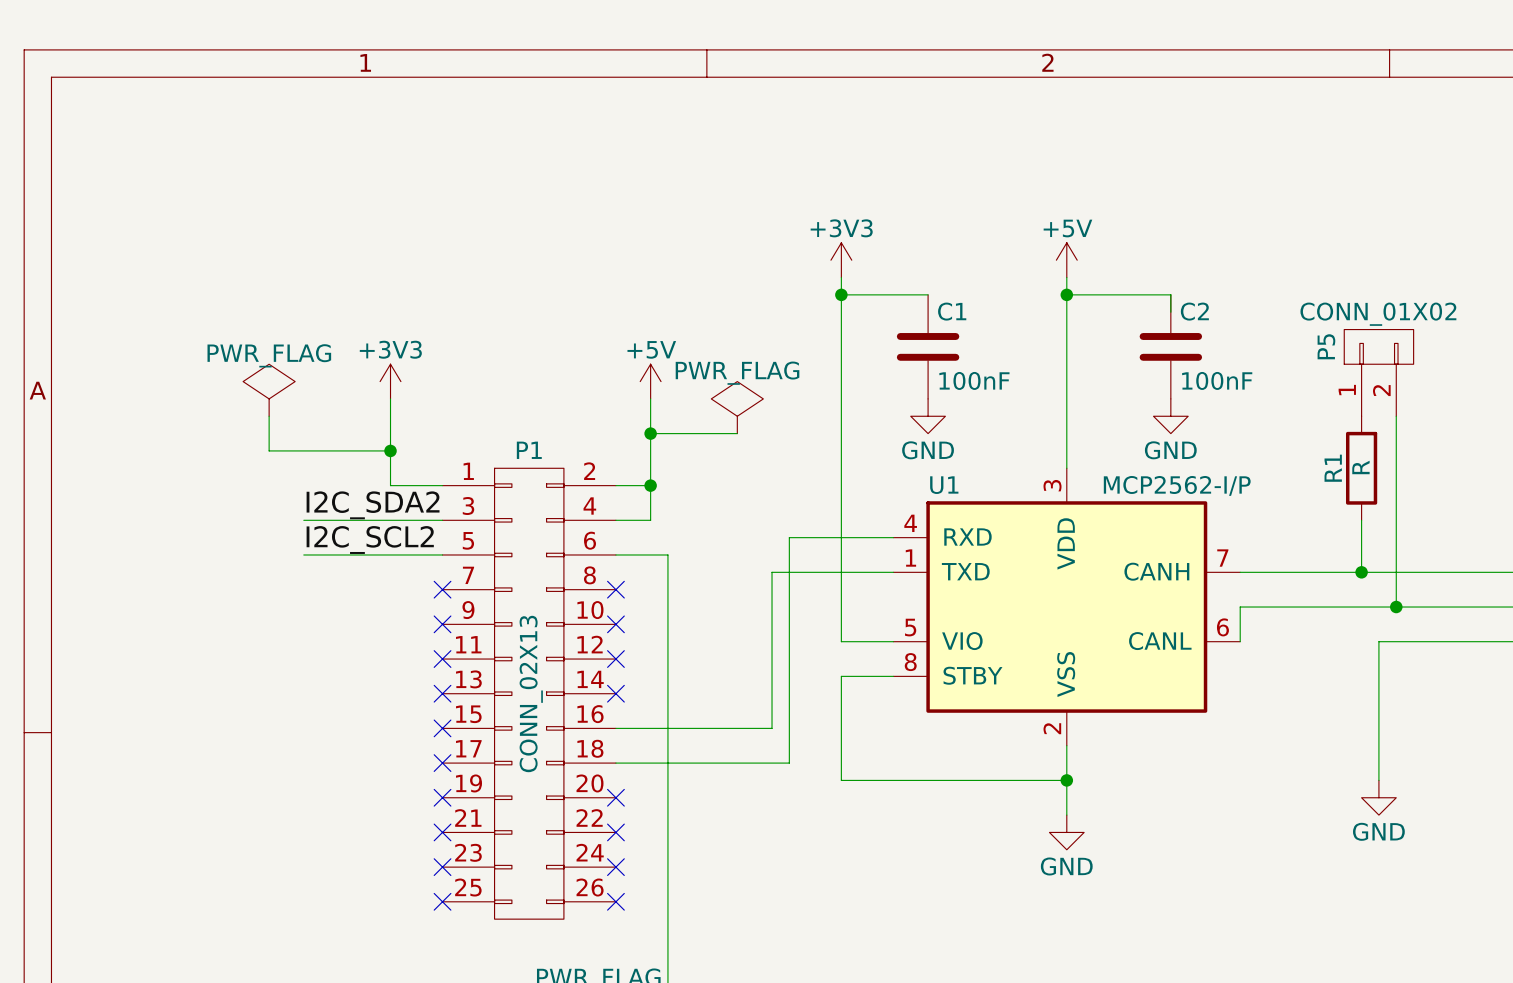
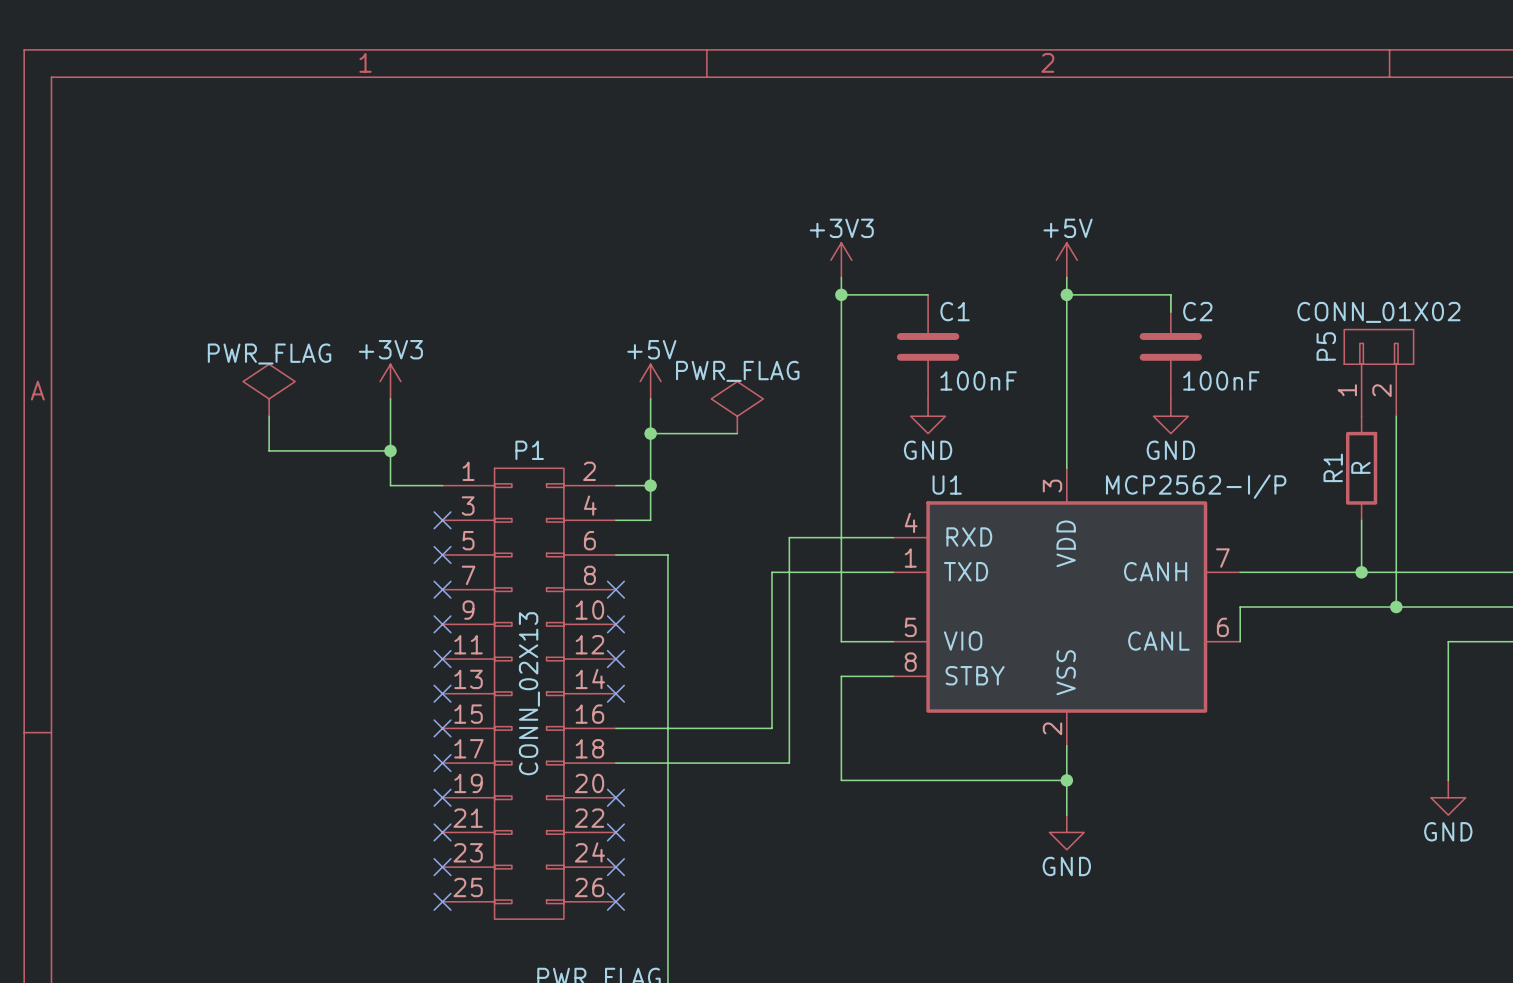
label: I2C_SDA2 (373, 505) -> none
wire: (303, 520) (442, 520) -> none
no-connect mark: none -> (442, 520)
label: I2C_SCL2 (370, 540) -> none
wire: (303, 554) (442, 554) -> none
no-connect mark: none -> (442, 554)
wire: (1448, 641) (1378, 641) (1378, 780) -> (1448, 641) (1448, 780)
power symbol position: GND (1378, 797) -> GND (1448, 797)

